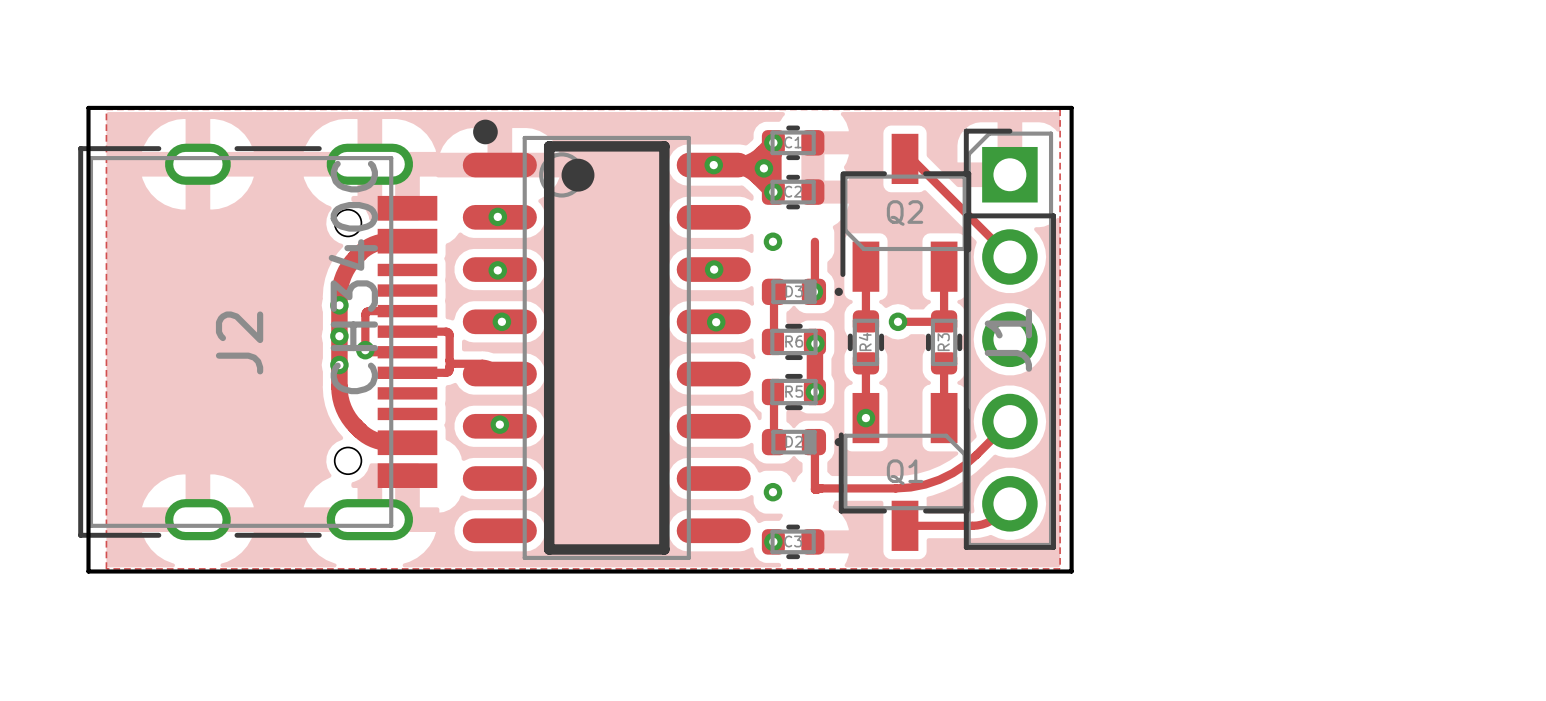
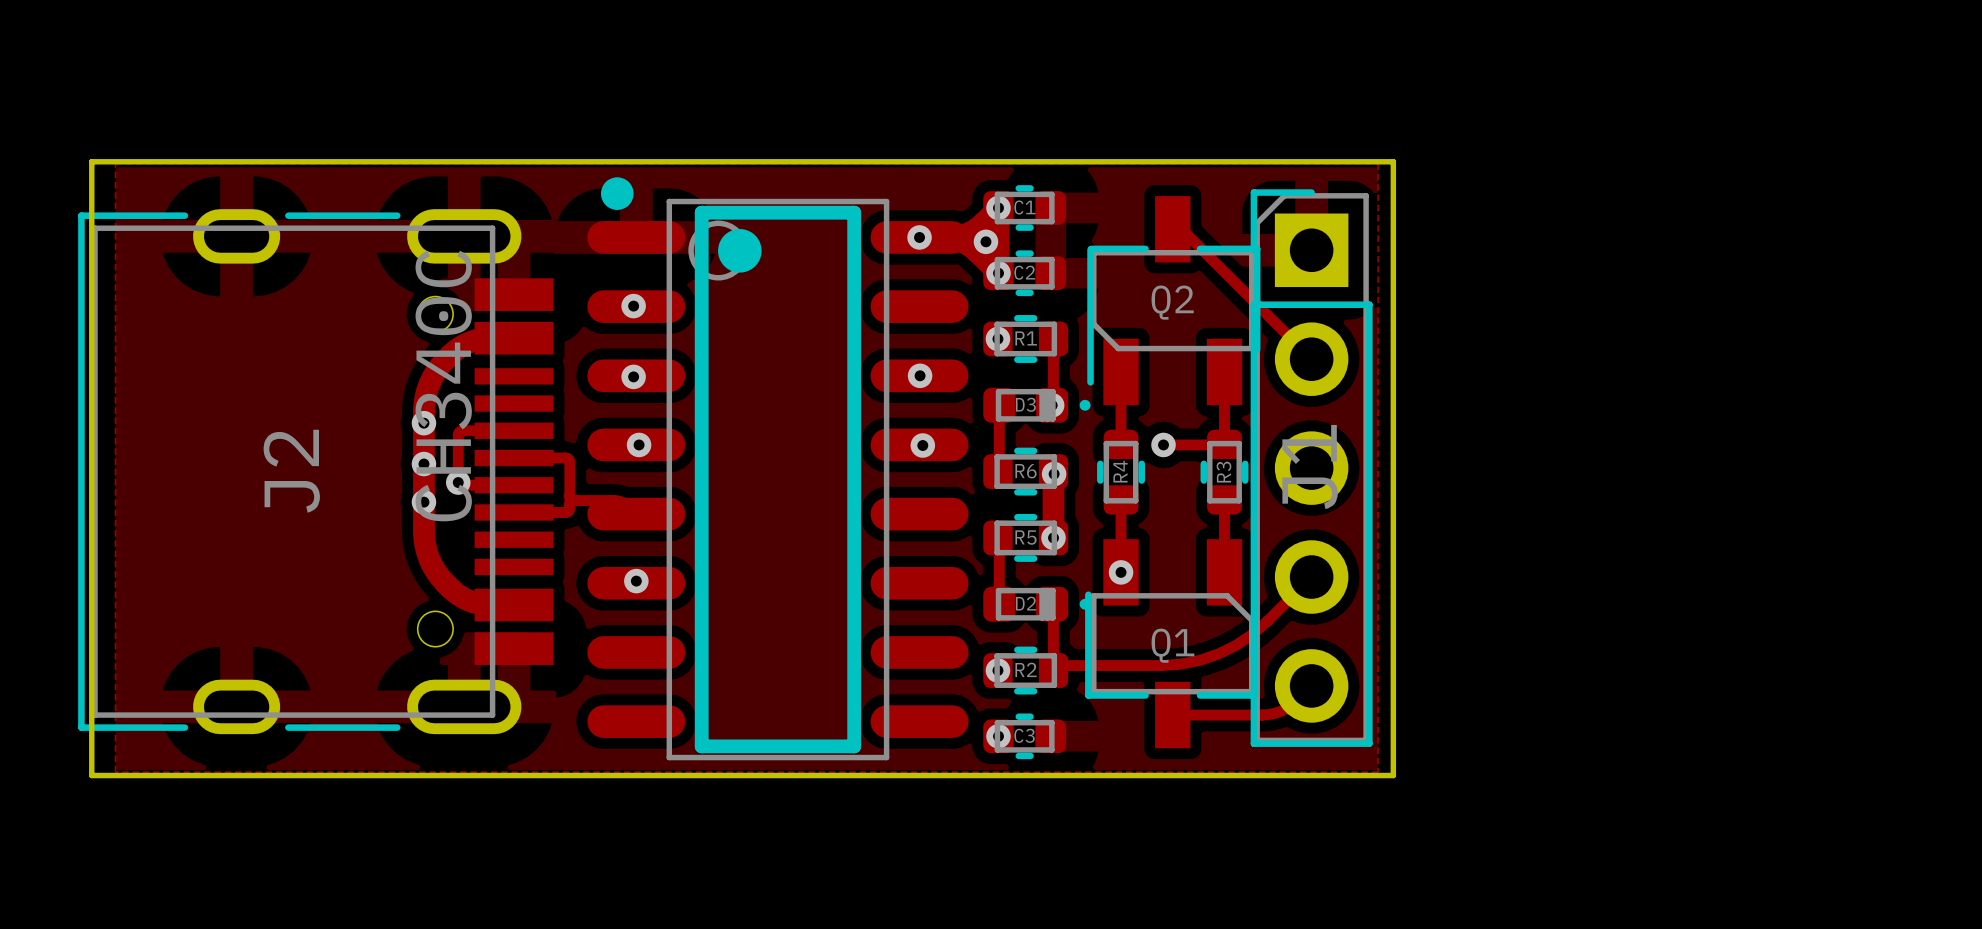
R1: none -> (1025, 338)
R2: none -> (1025, 670)

